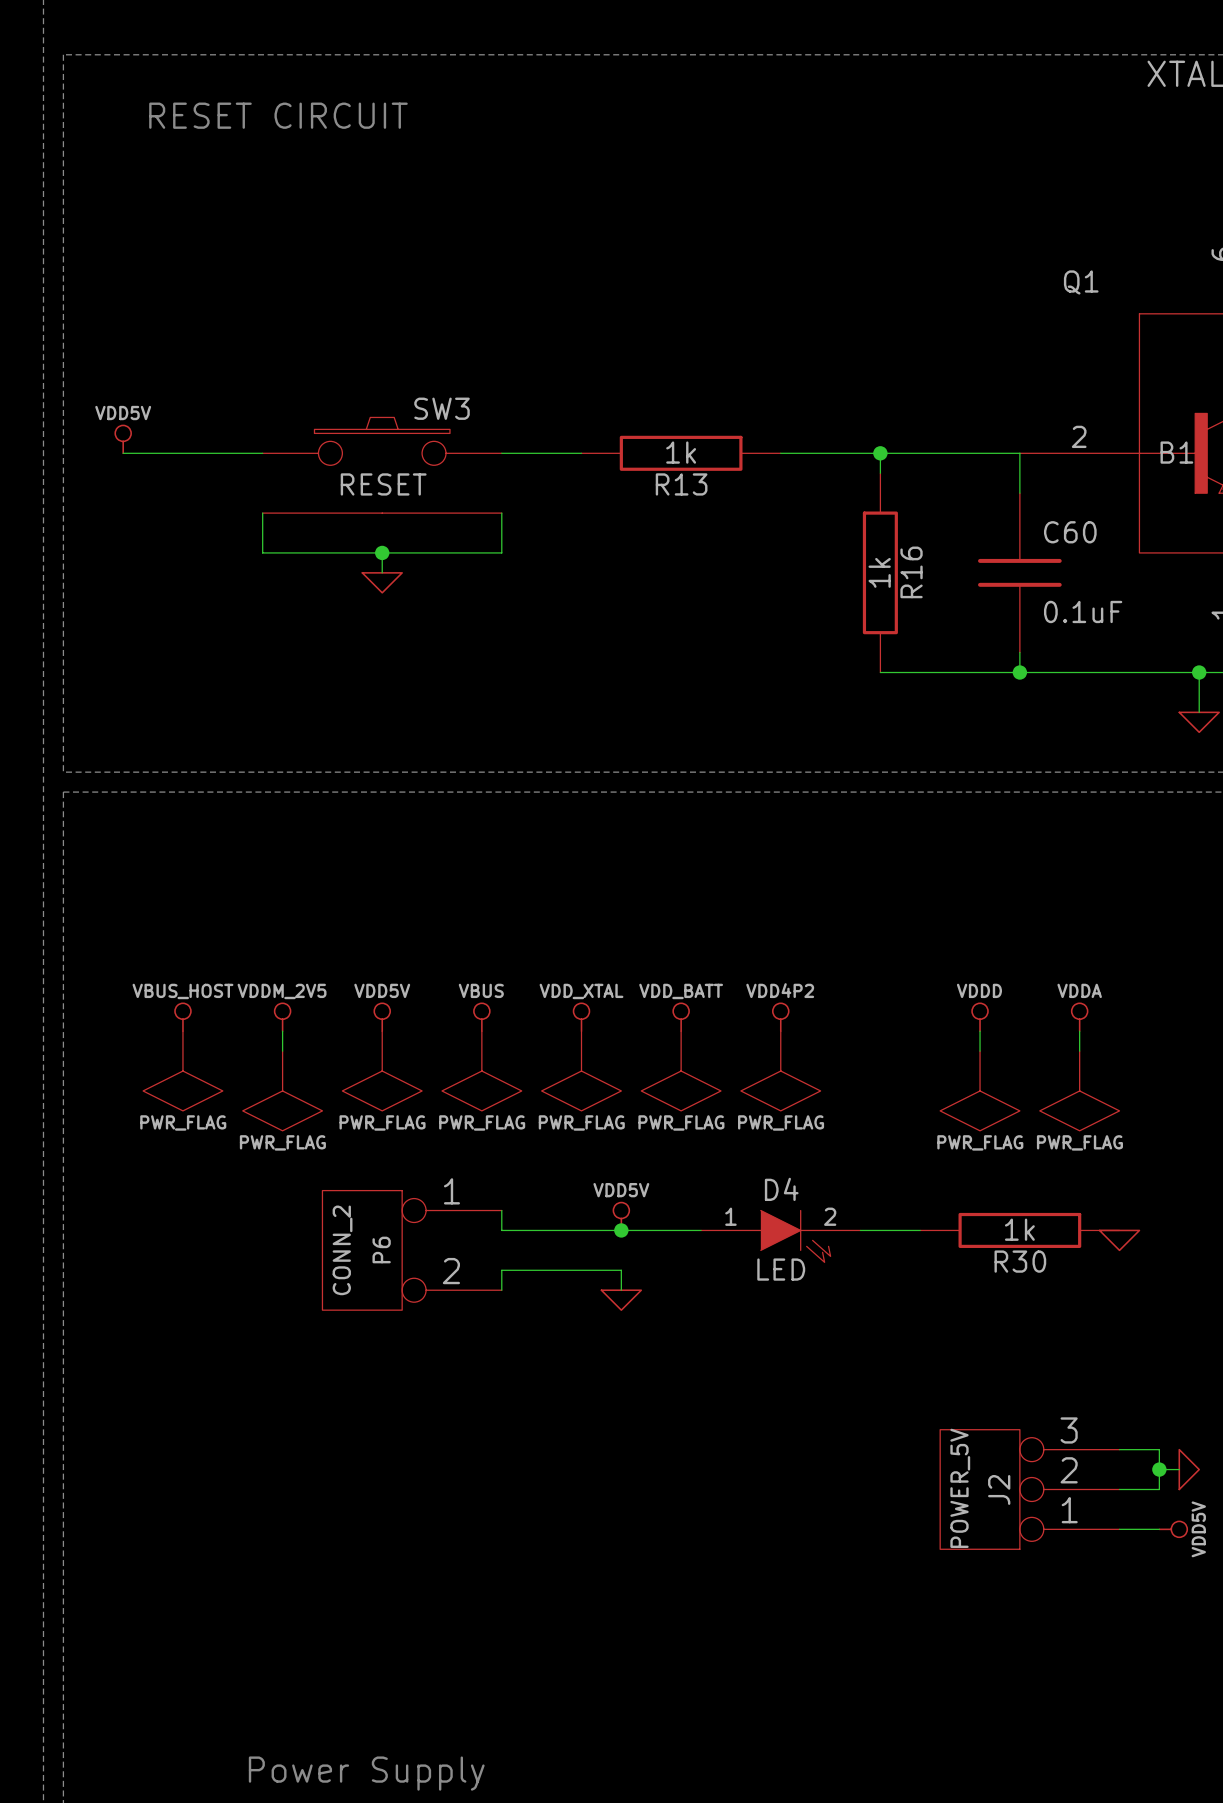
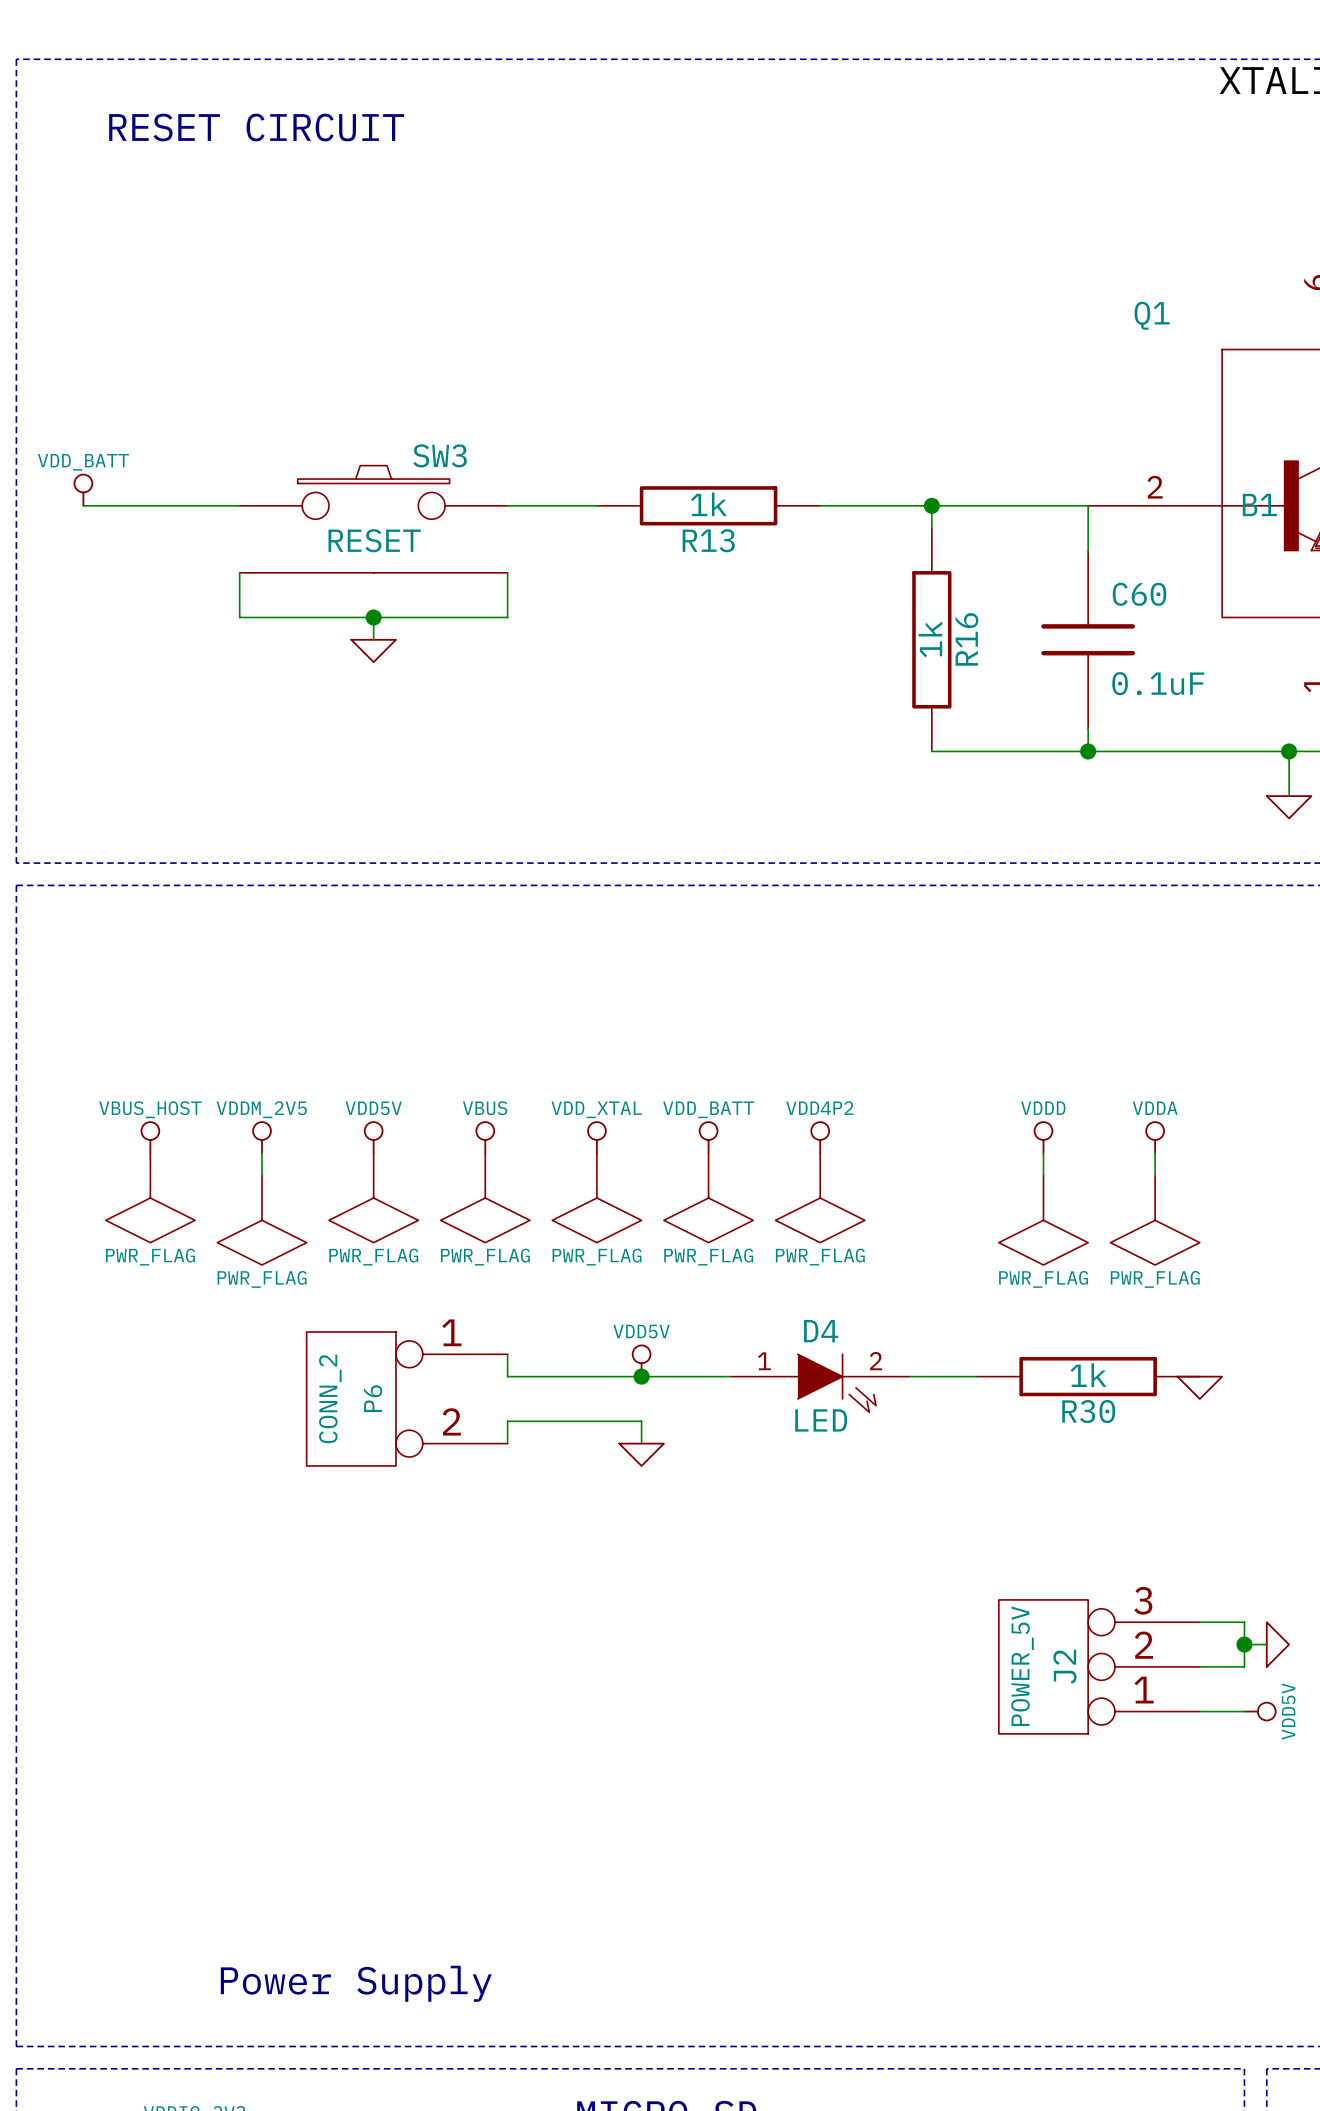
power symbol: VDD5V (123, 439) -> VDD_BATT (83, 490)

